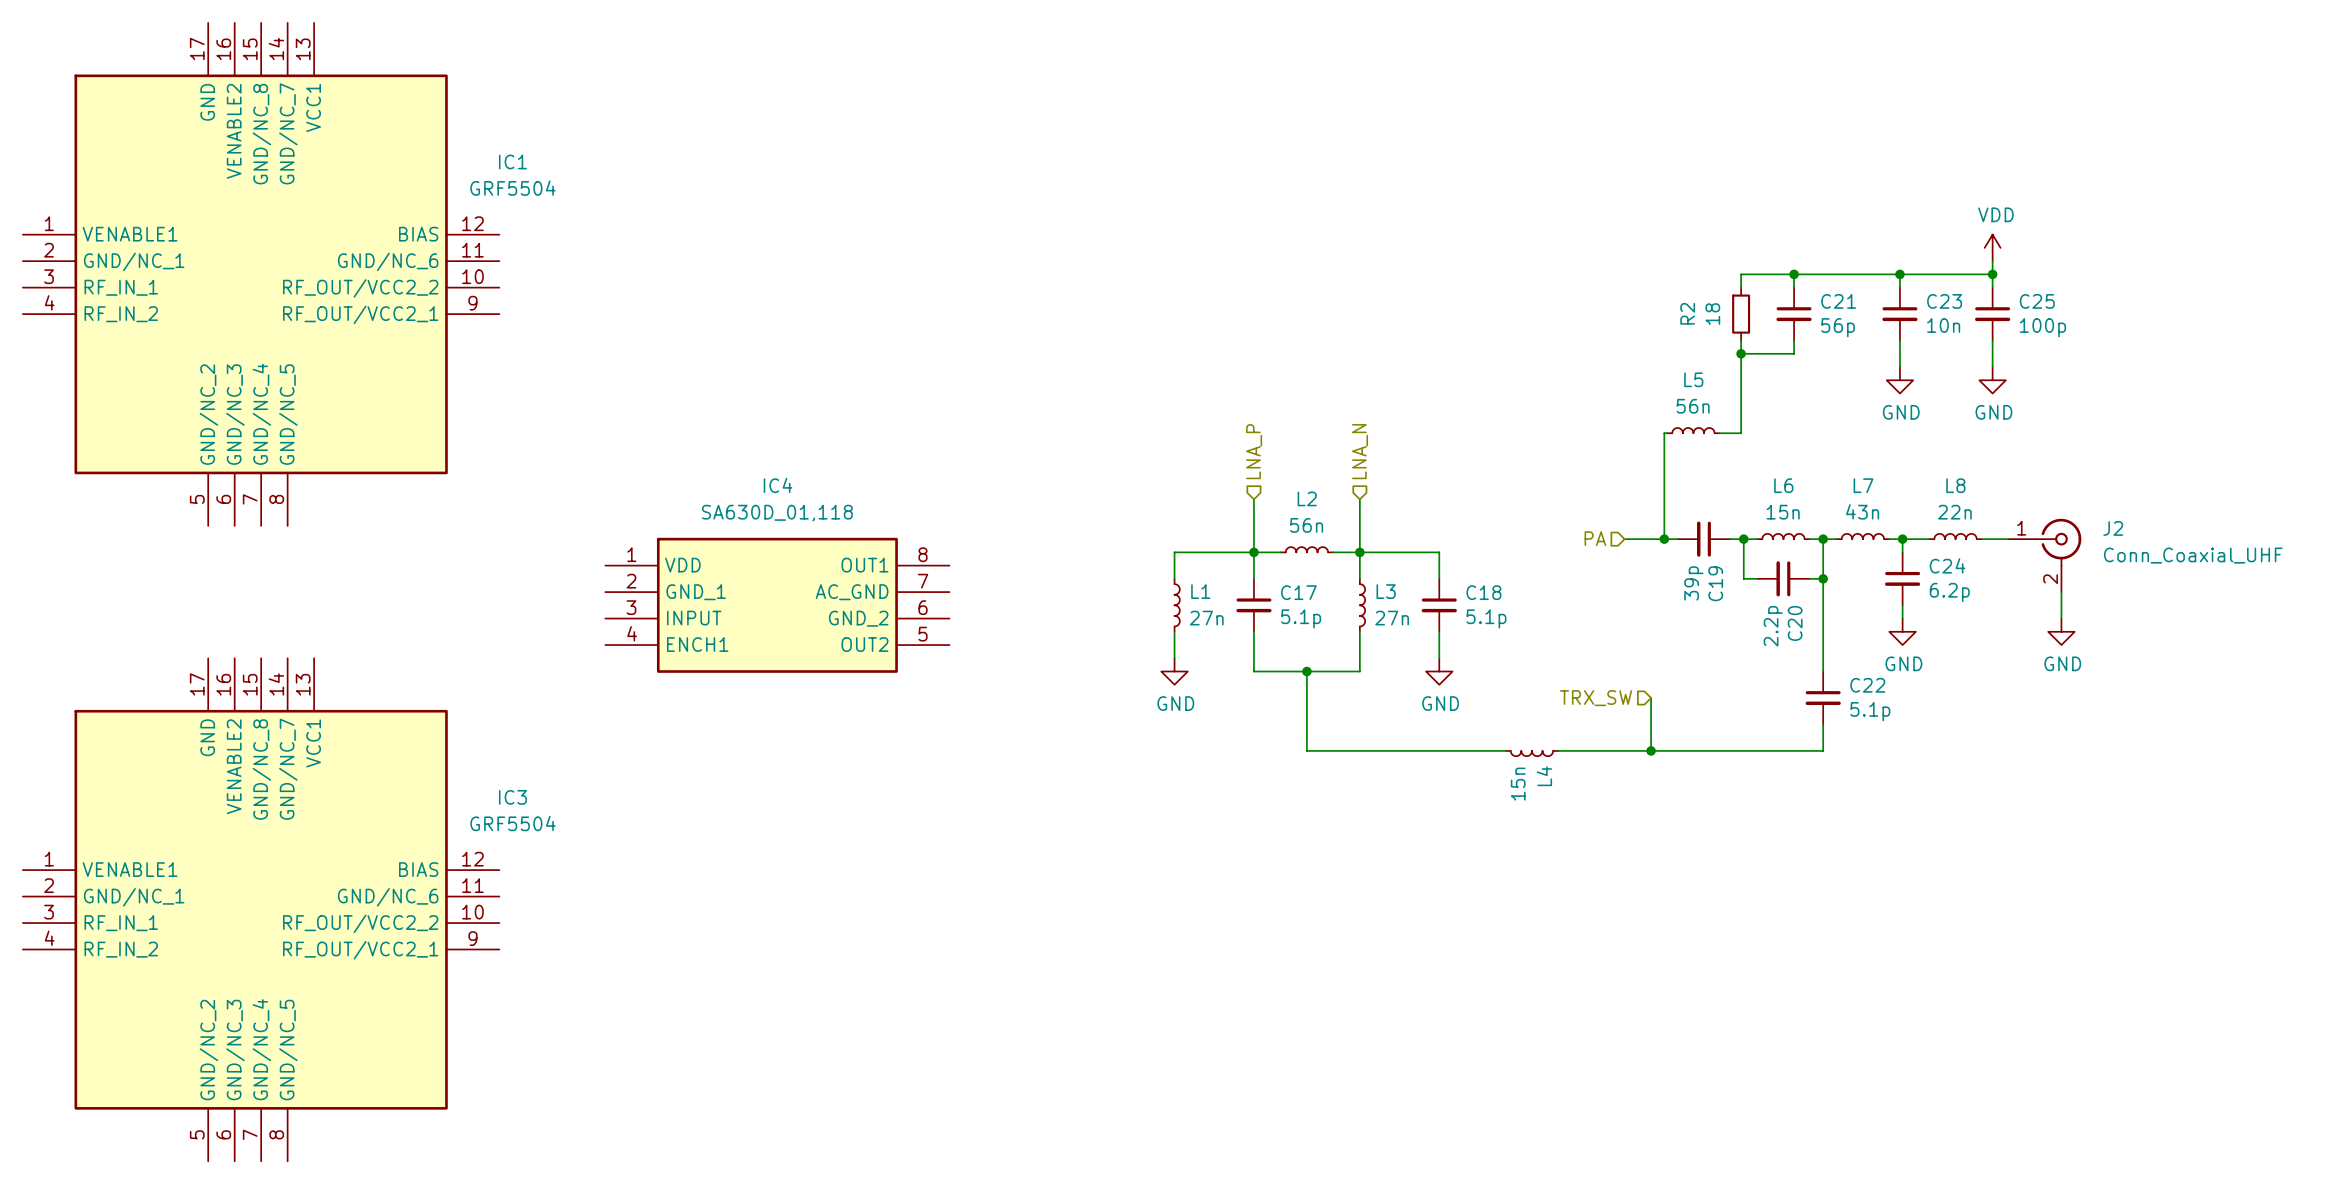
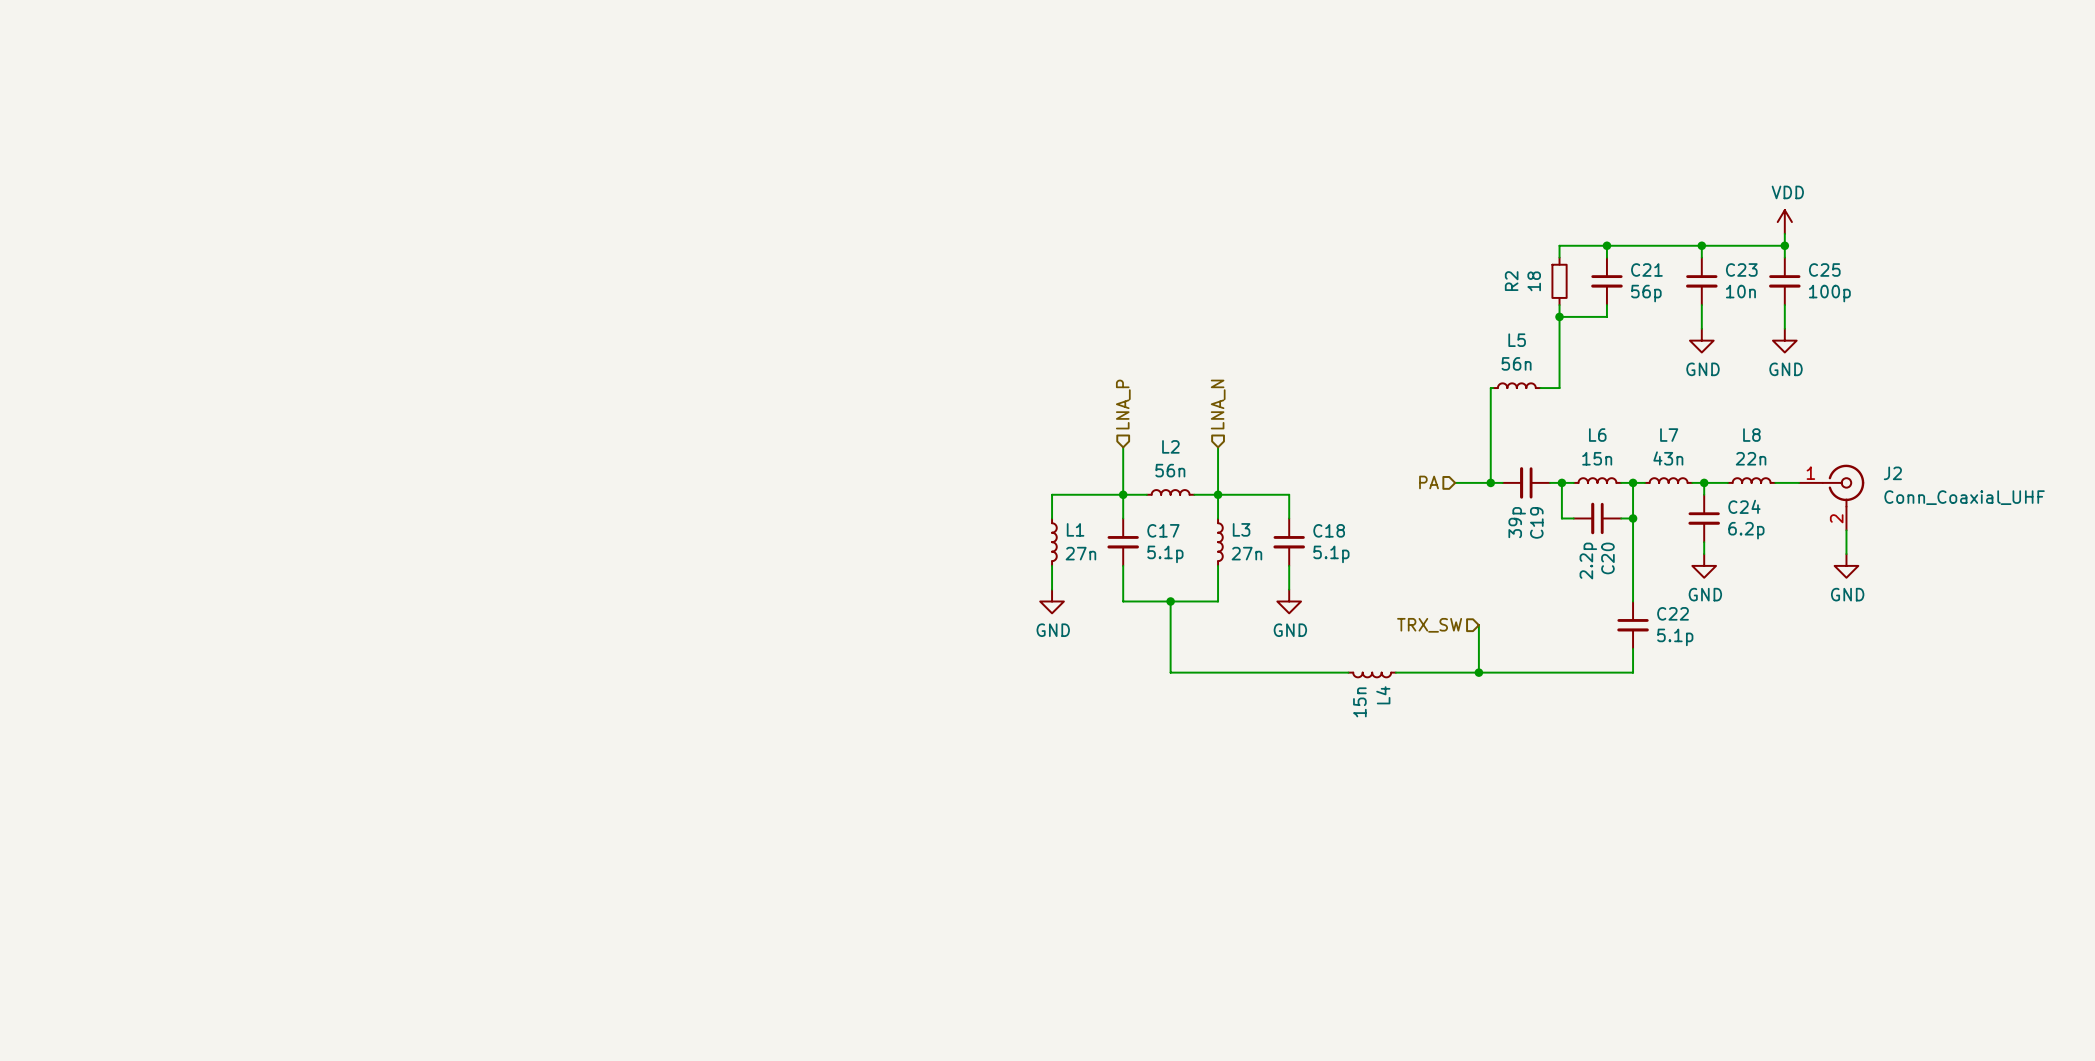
IC1: GRF5504 (261, 274) -> none
IC4: SA630D_01,118 (777, 605) -> none
IC3: GRF5504 (261, 909) -> none

